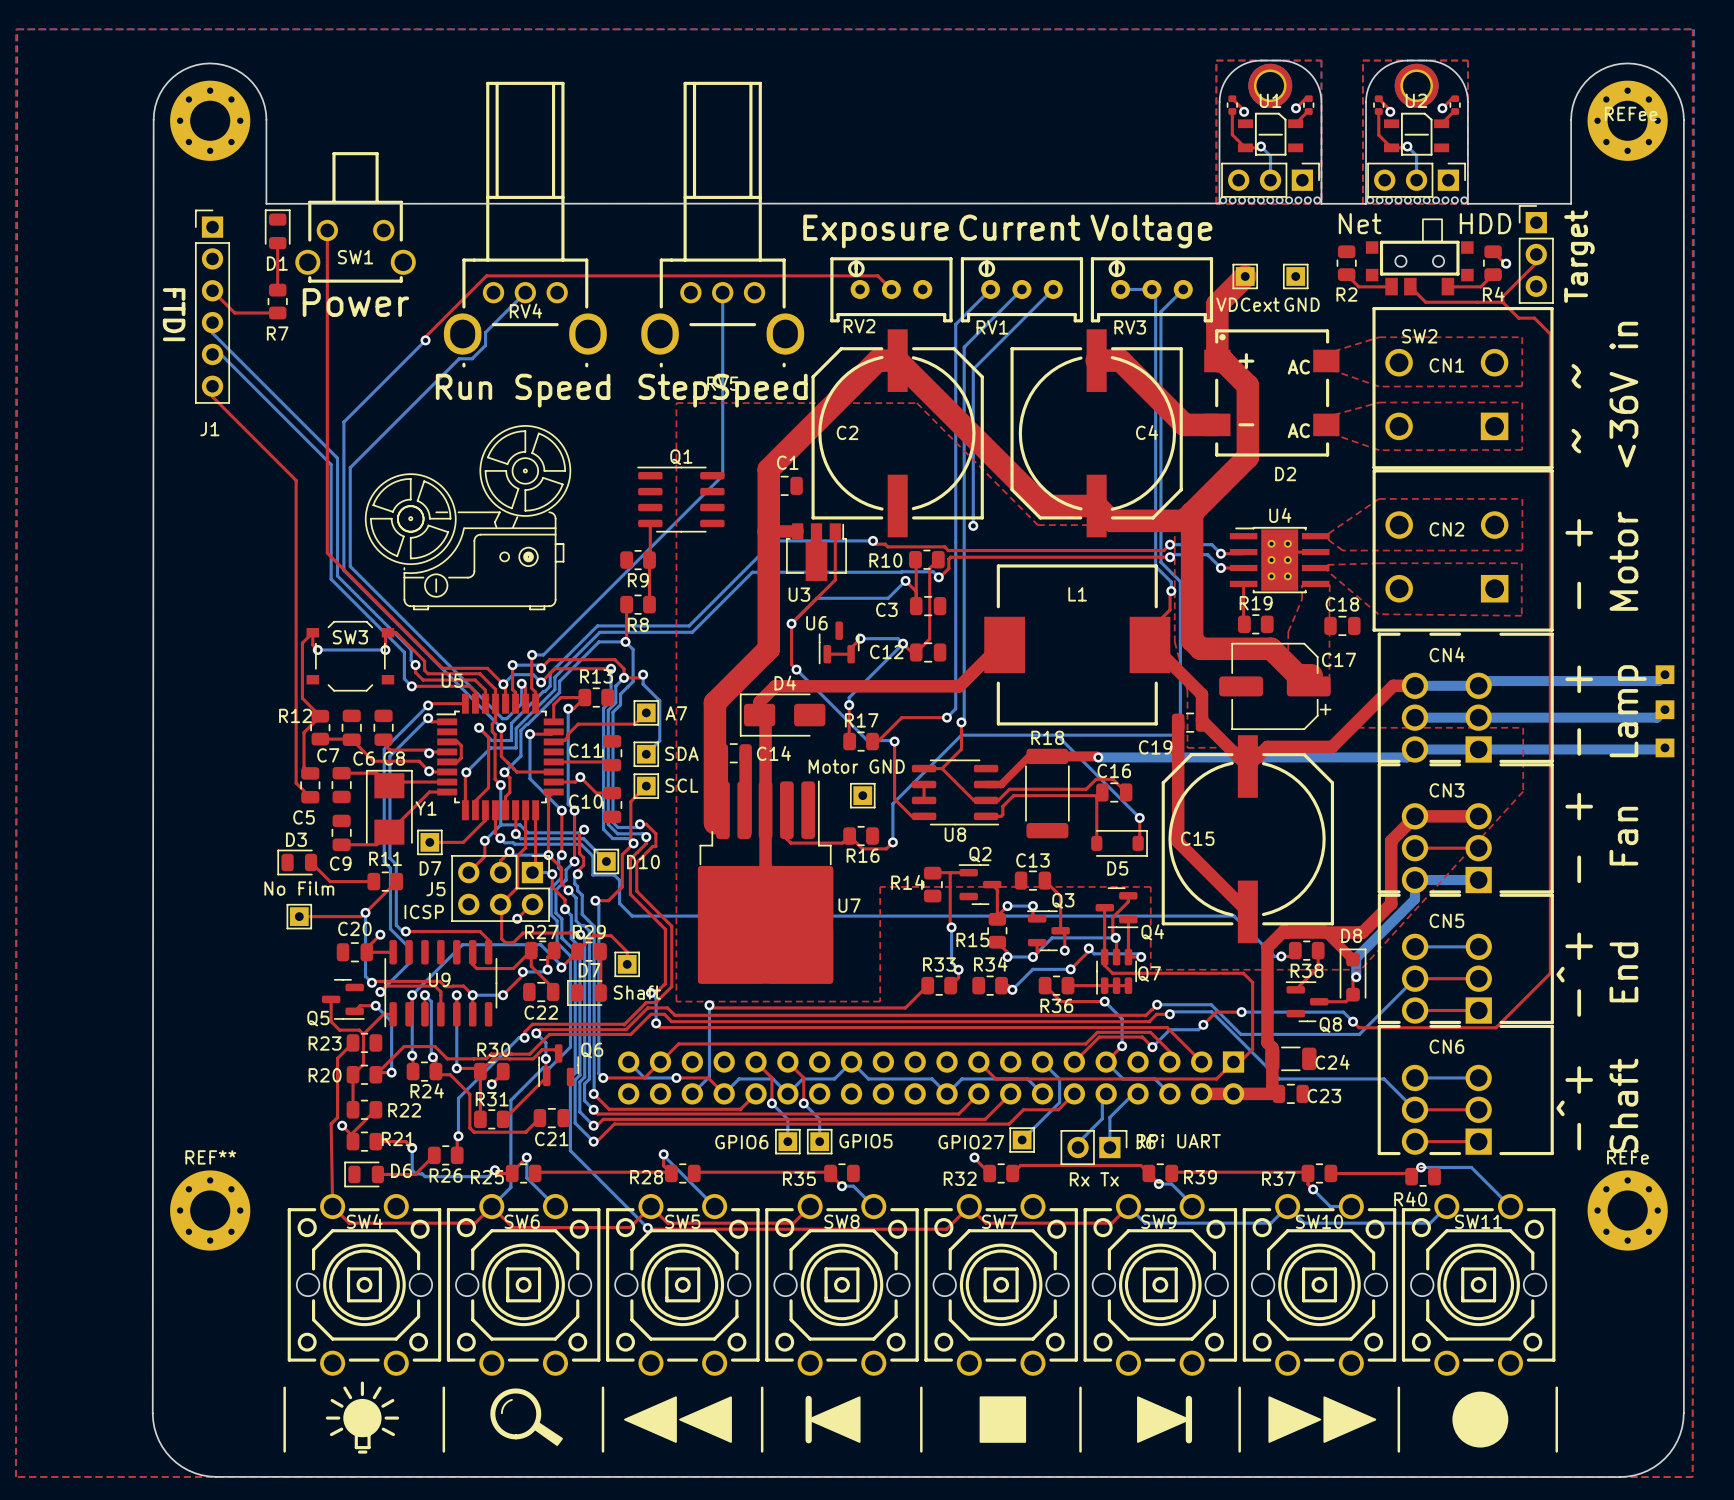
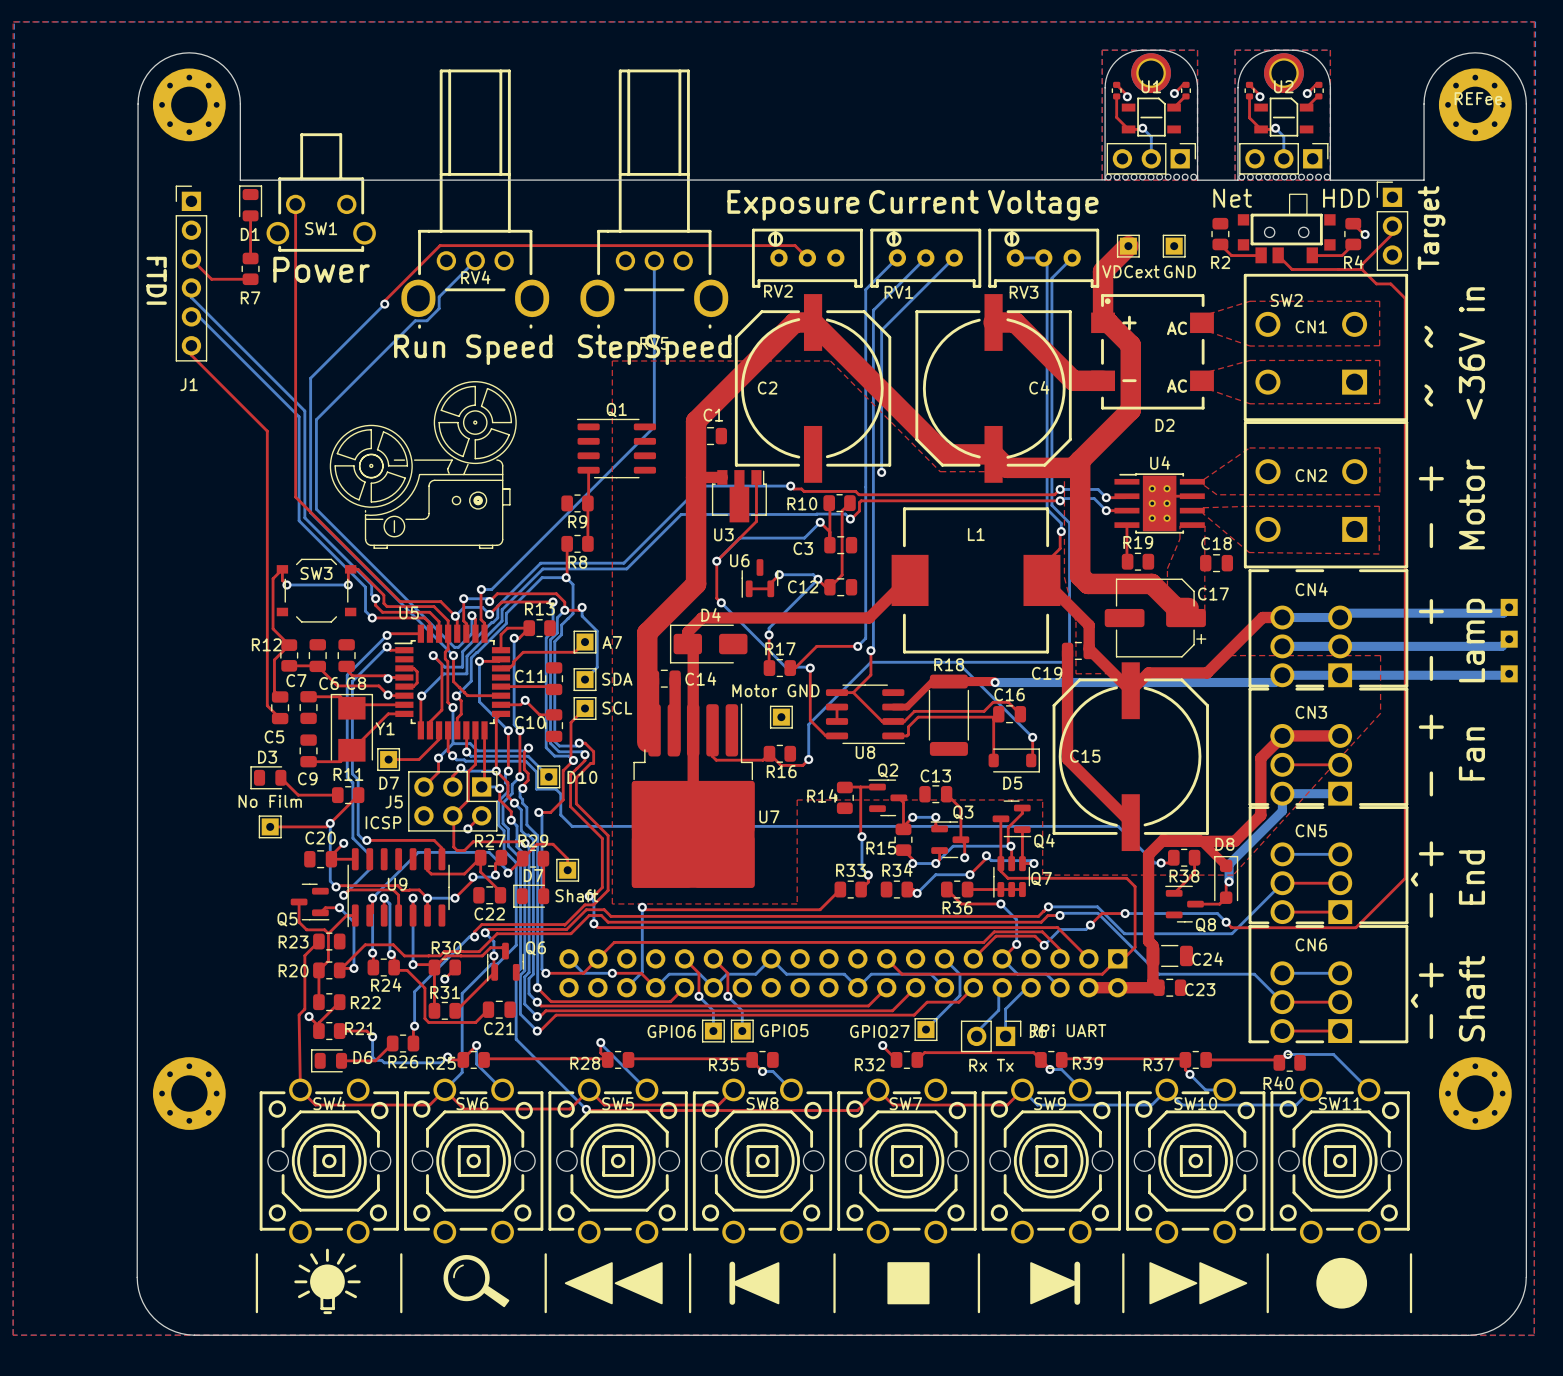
REF** name: REF** (210, 1157) -> none
REFe name: REFe (1627, 1157) -> none

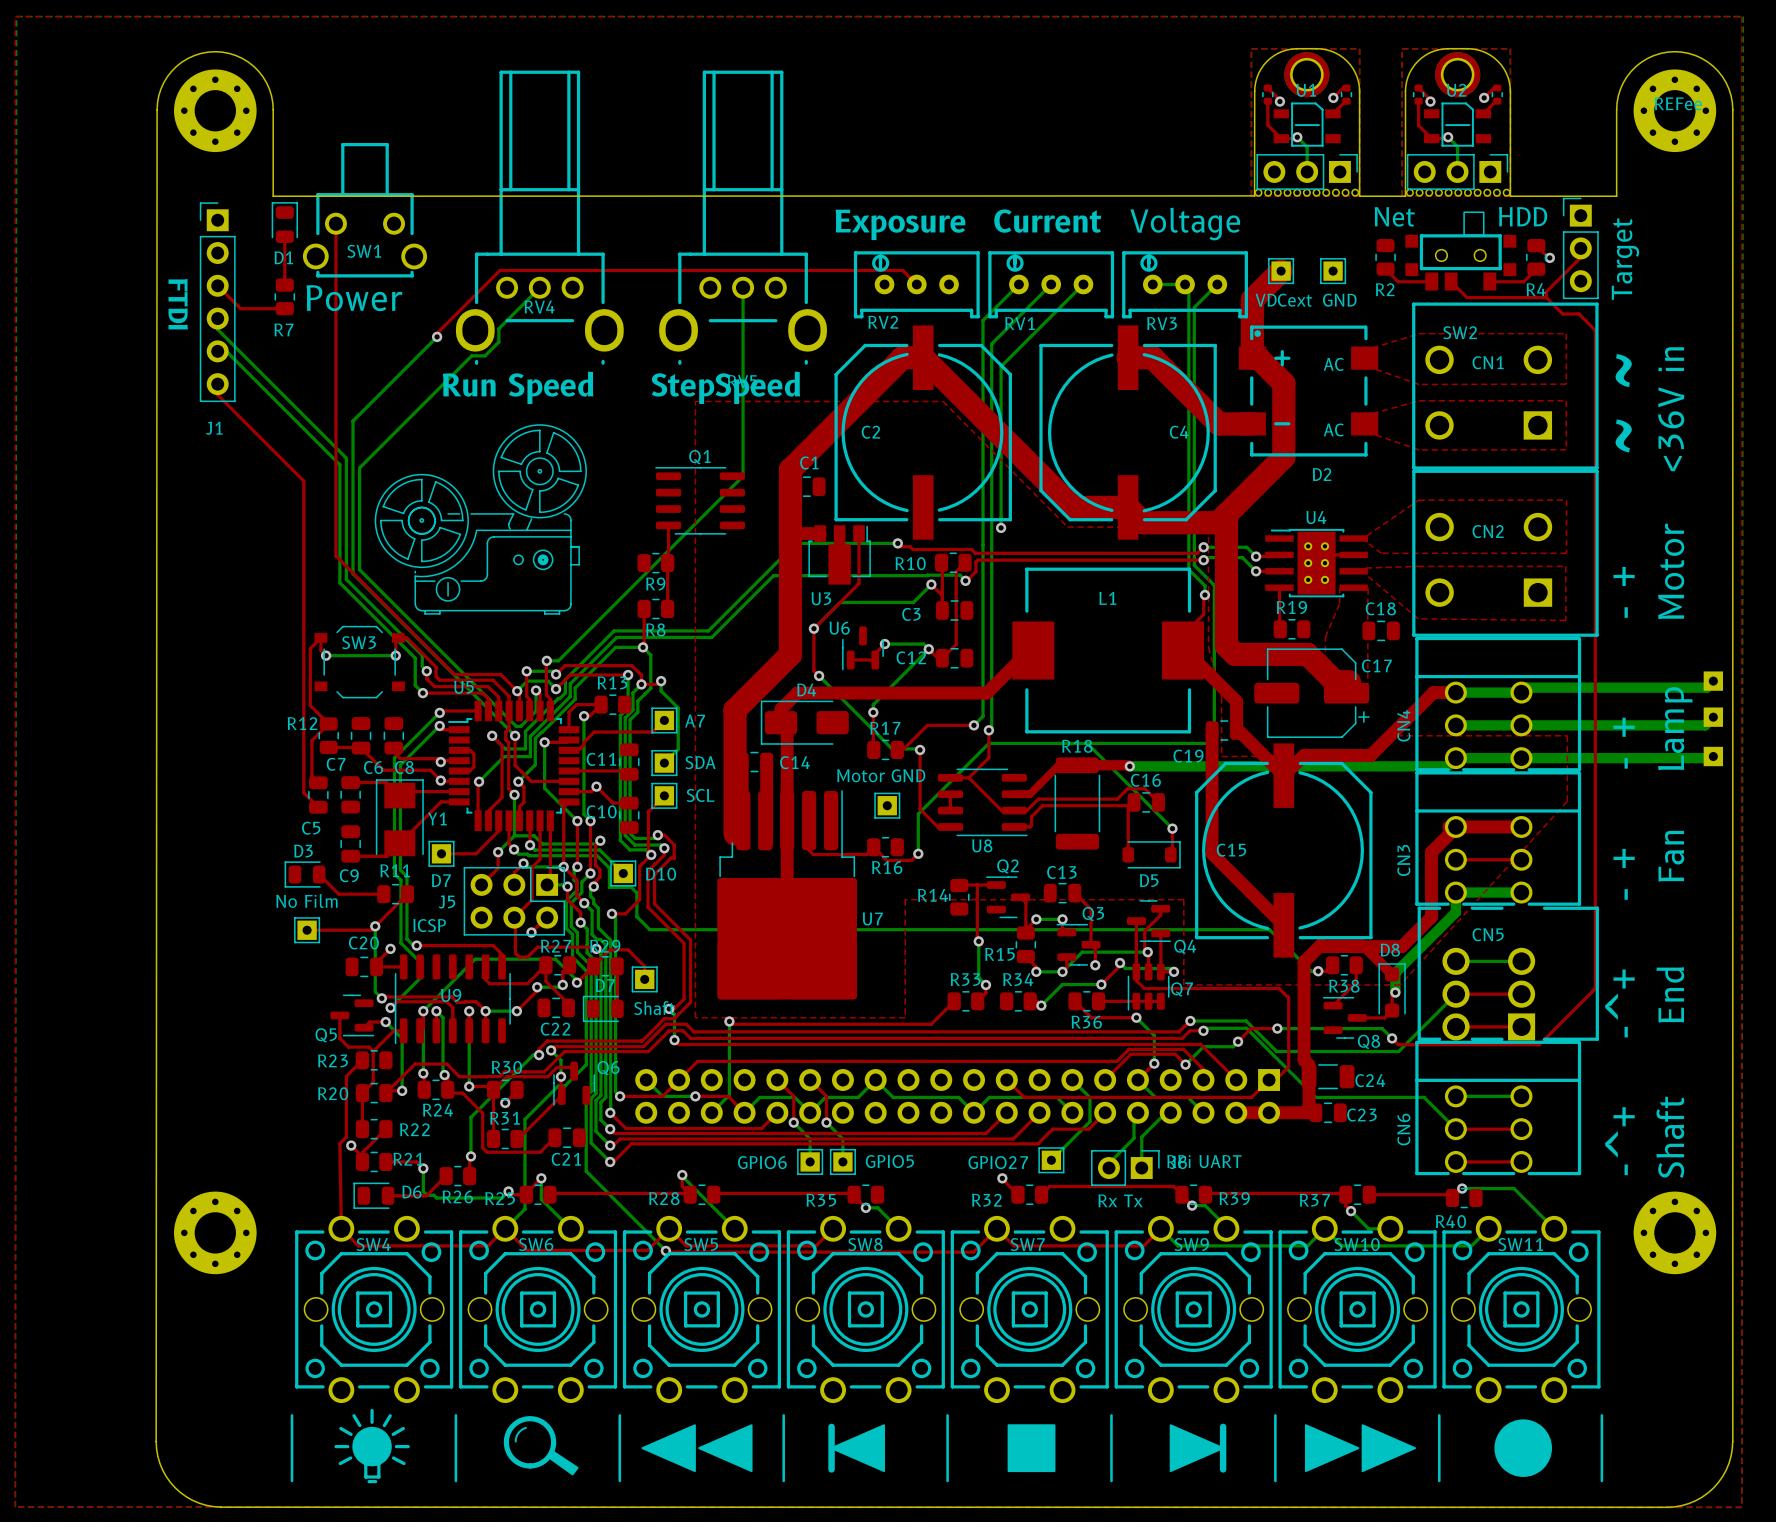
CN4 footprint: [1248, 569, 1409, 688] -> [1415, 636, 1582, 772]
CN4 name position: CN4 (1311, 589) -> CN4 (1403, 725)
CN3 footprint: [1248, 687, 1409, 806] -> [1415, 771, 1582, 906]
CN3 name position: CN3 (1311, 712) -> CN3 (1403, 860)
CN6 footprint: [1248, 924, 1409, 1044] -> [1415, 1040, 1582, 1176]
CN6 name position: CN6 (1311, 944) -> CN6 (1403, 1129)

